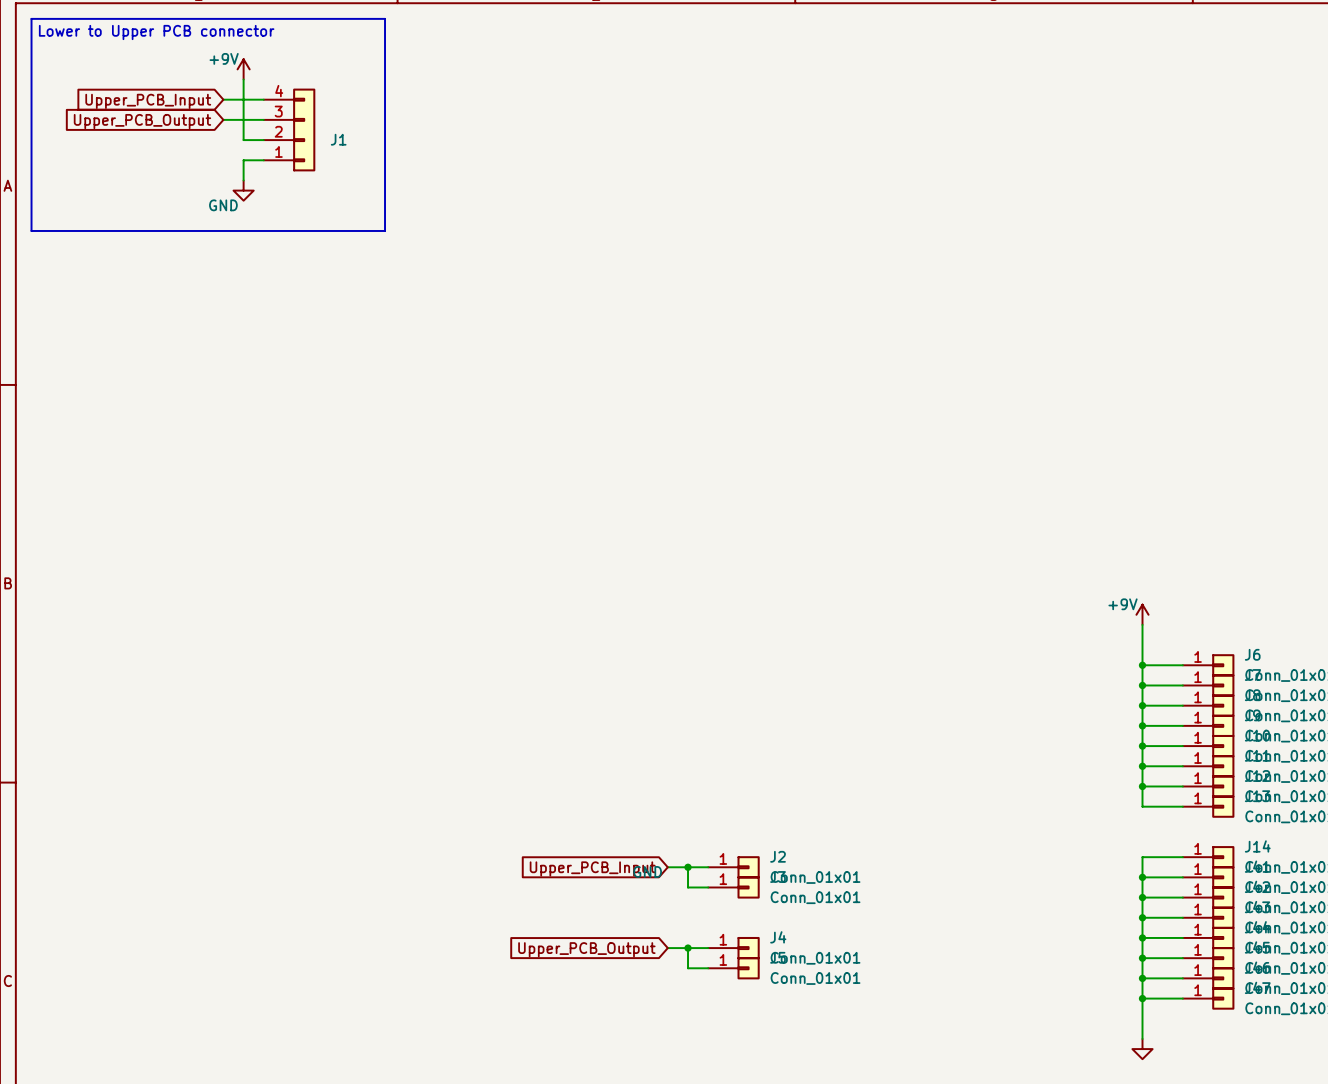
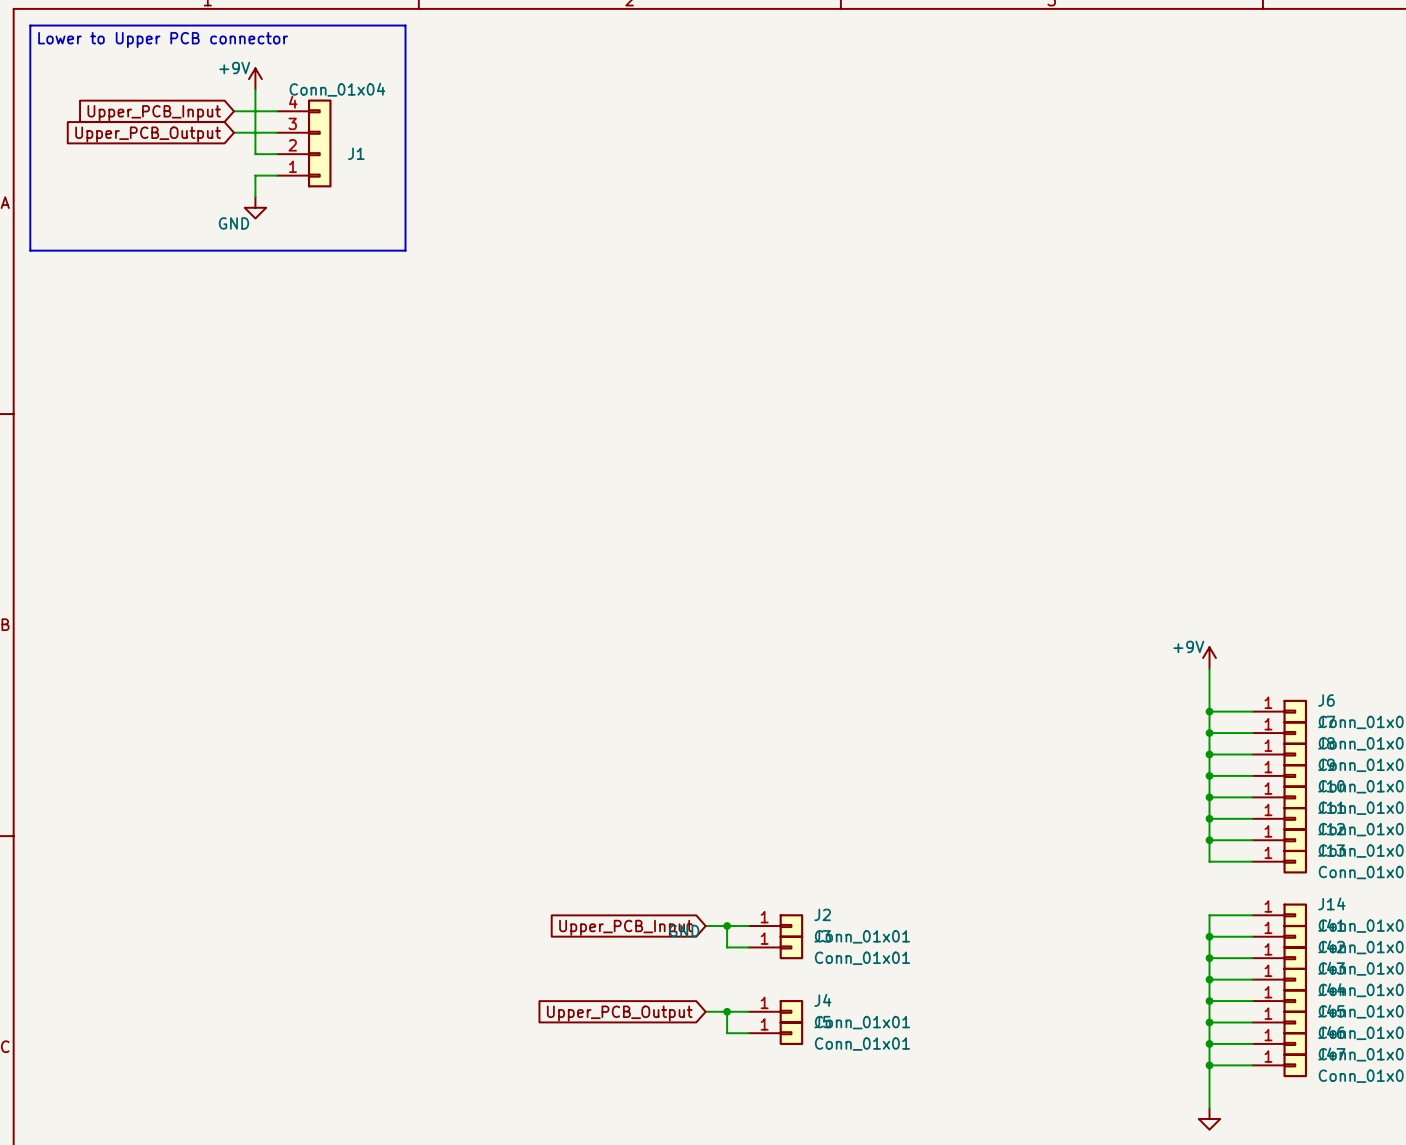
J1 value: none -> Conn_01x04 (337, 89)

